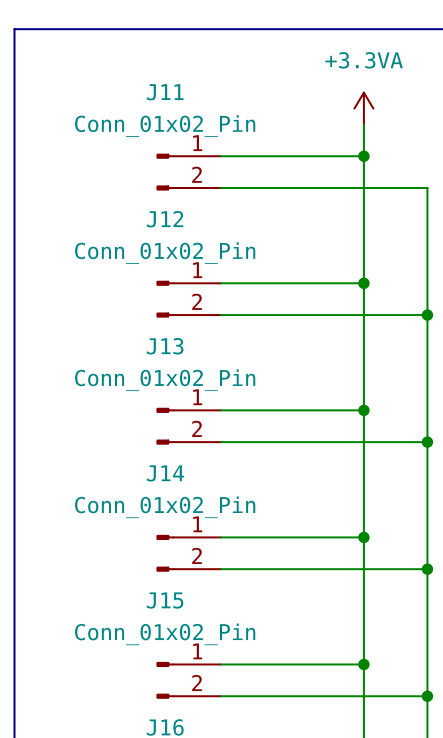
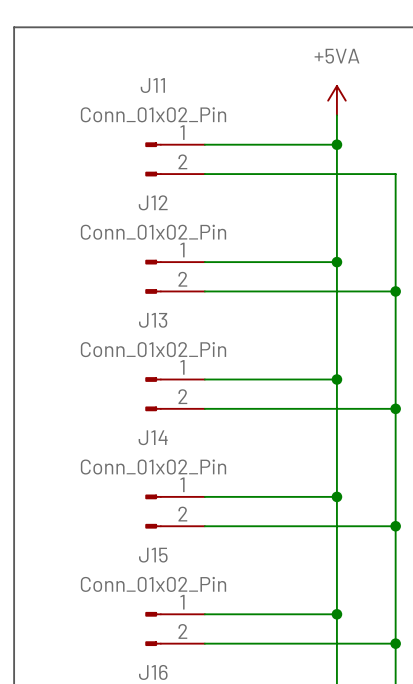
power symbol: +3.3VA (363, 108) -> +5VA (336, 100)

